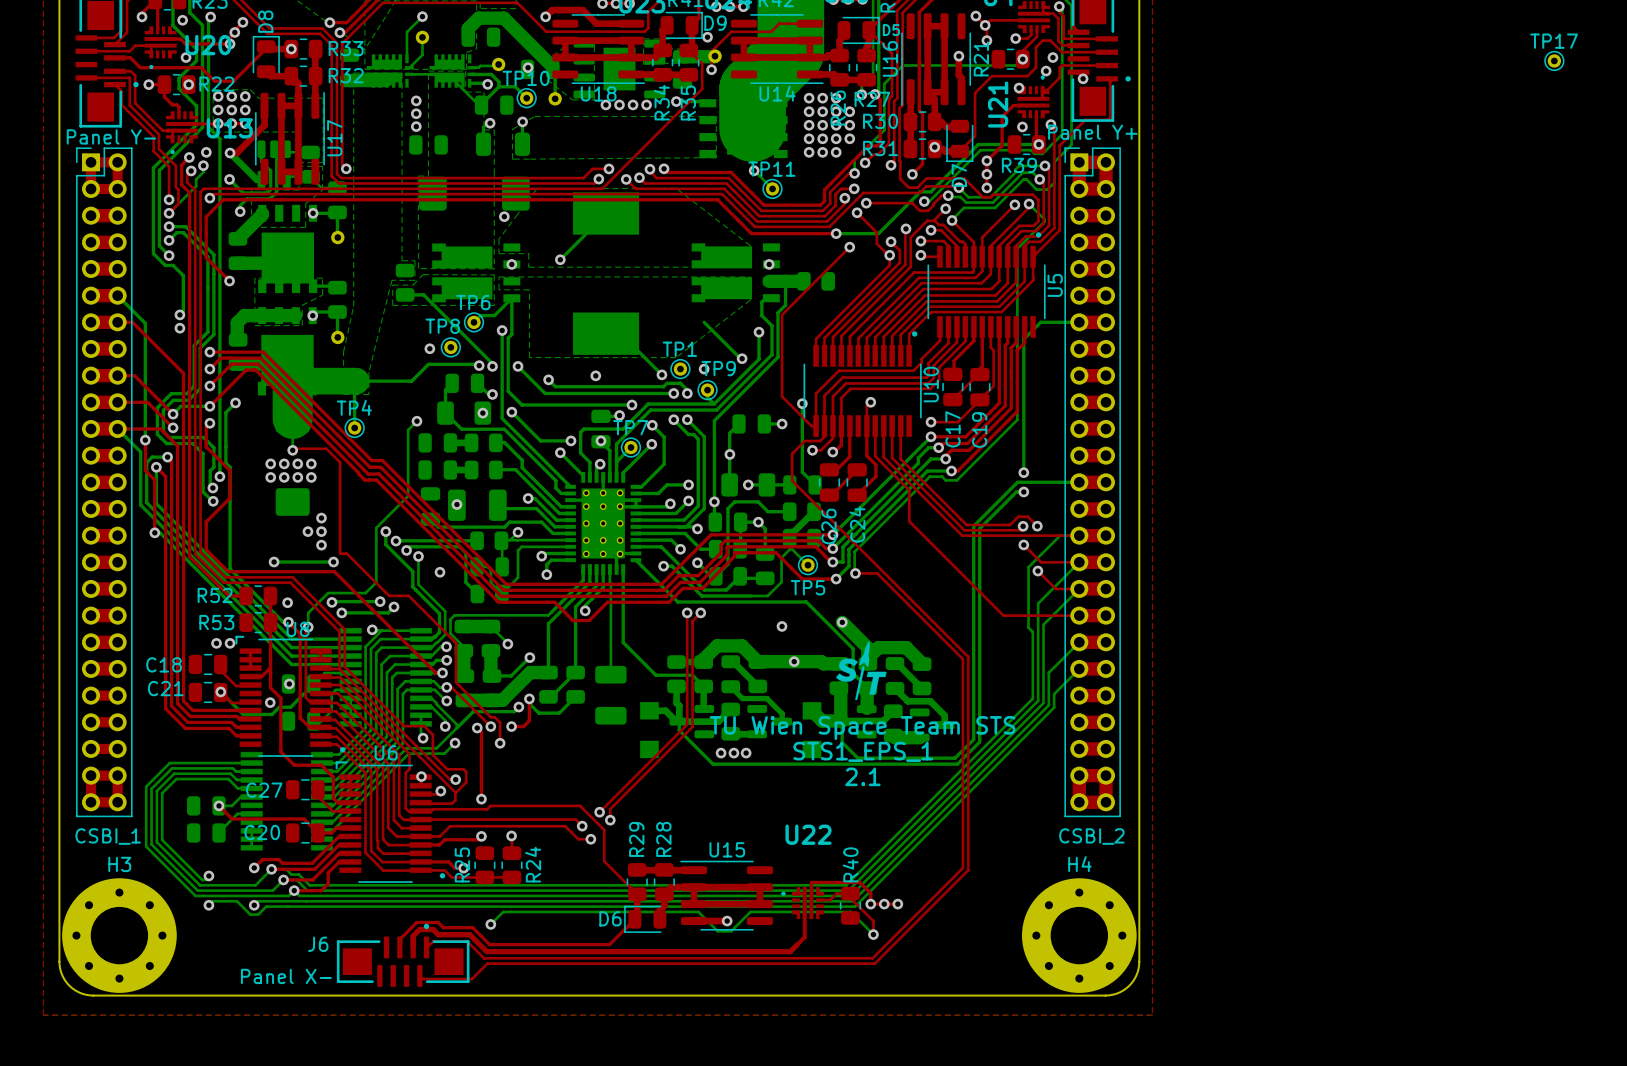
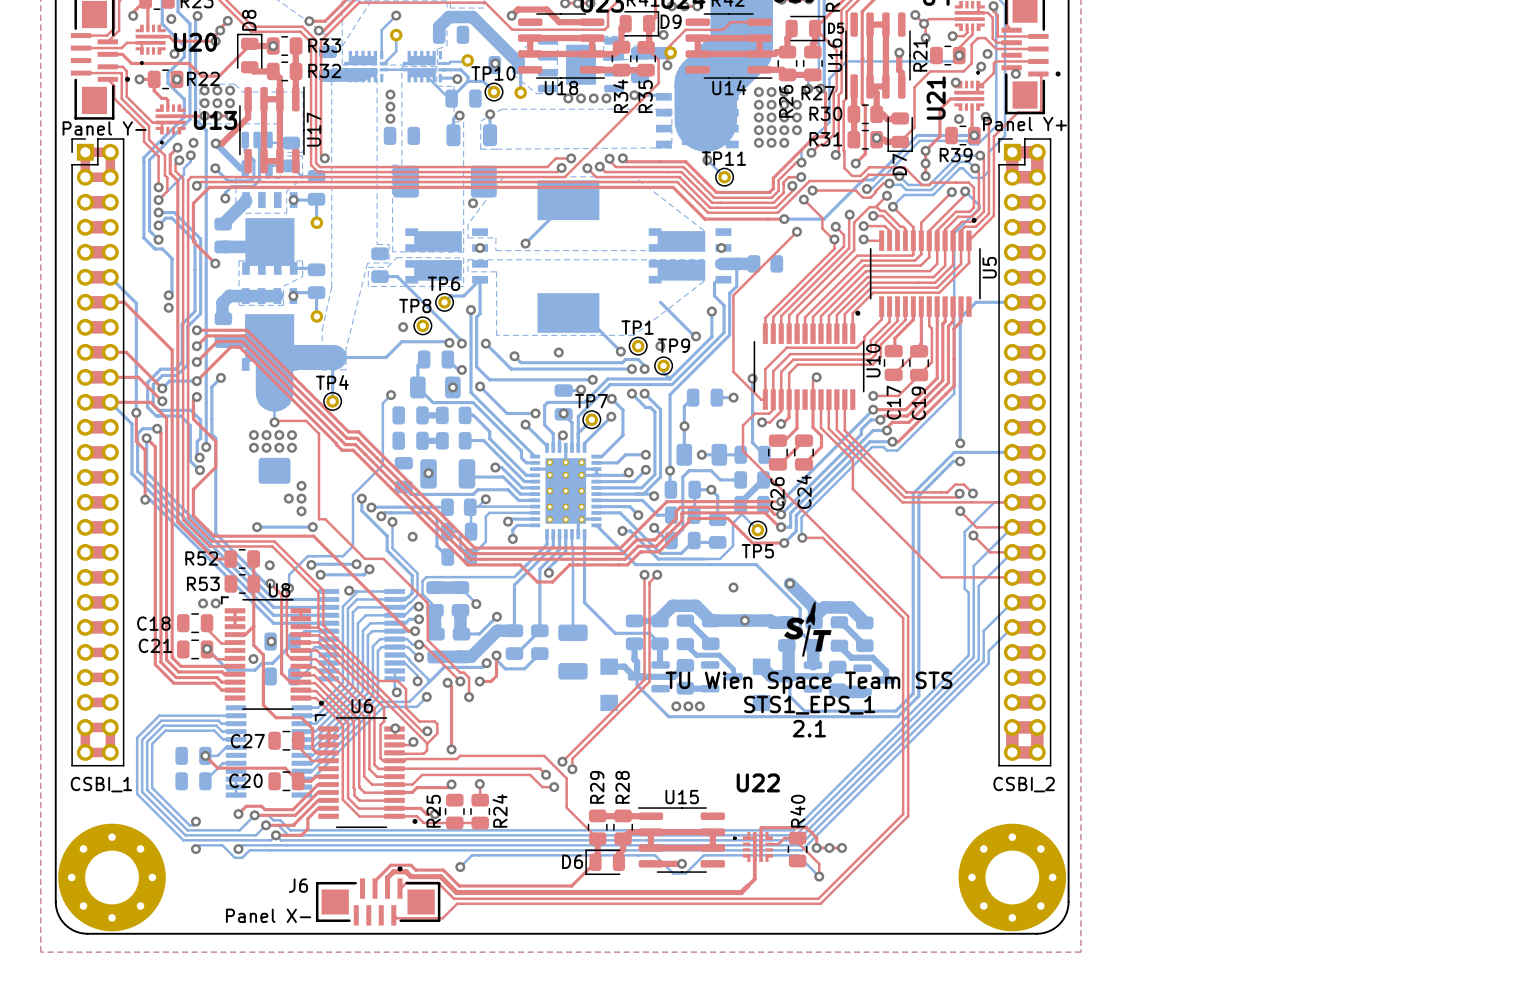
TP17: (1554, 60) -> none
H3 name: H3 (119, 864) -> none
H4 name: H4 (1079, 864) -> none

